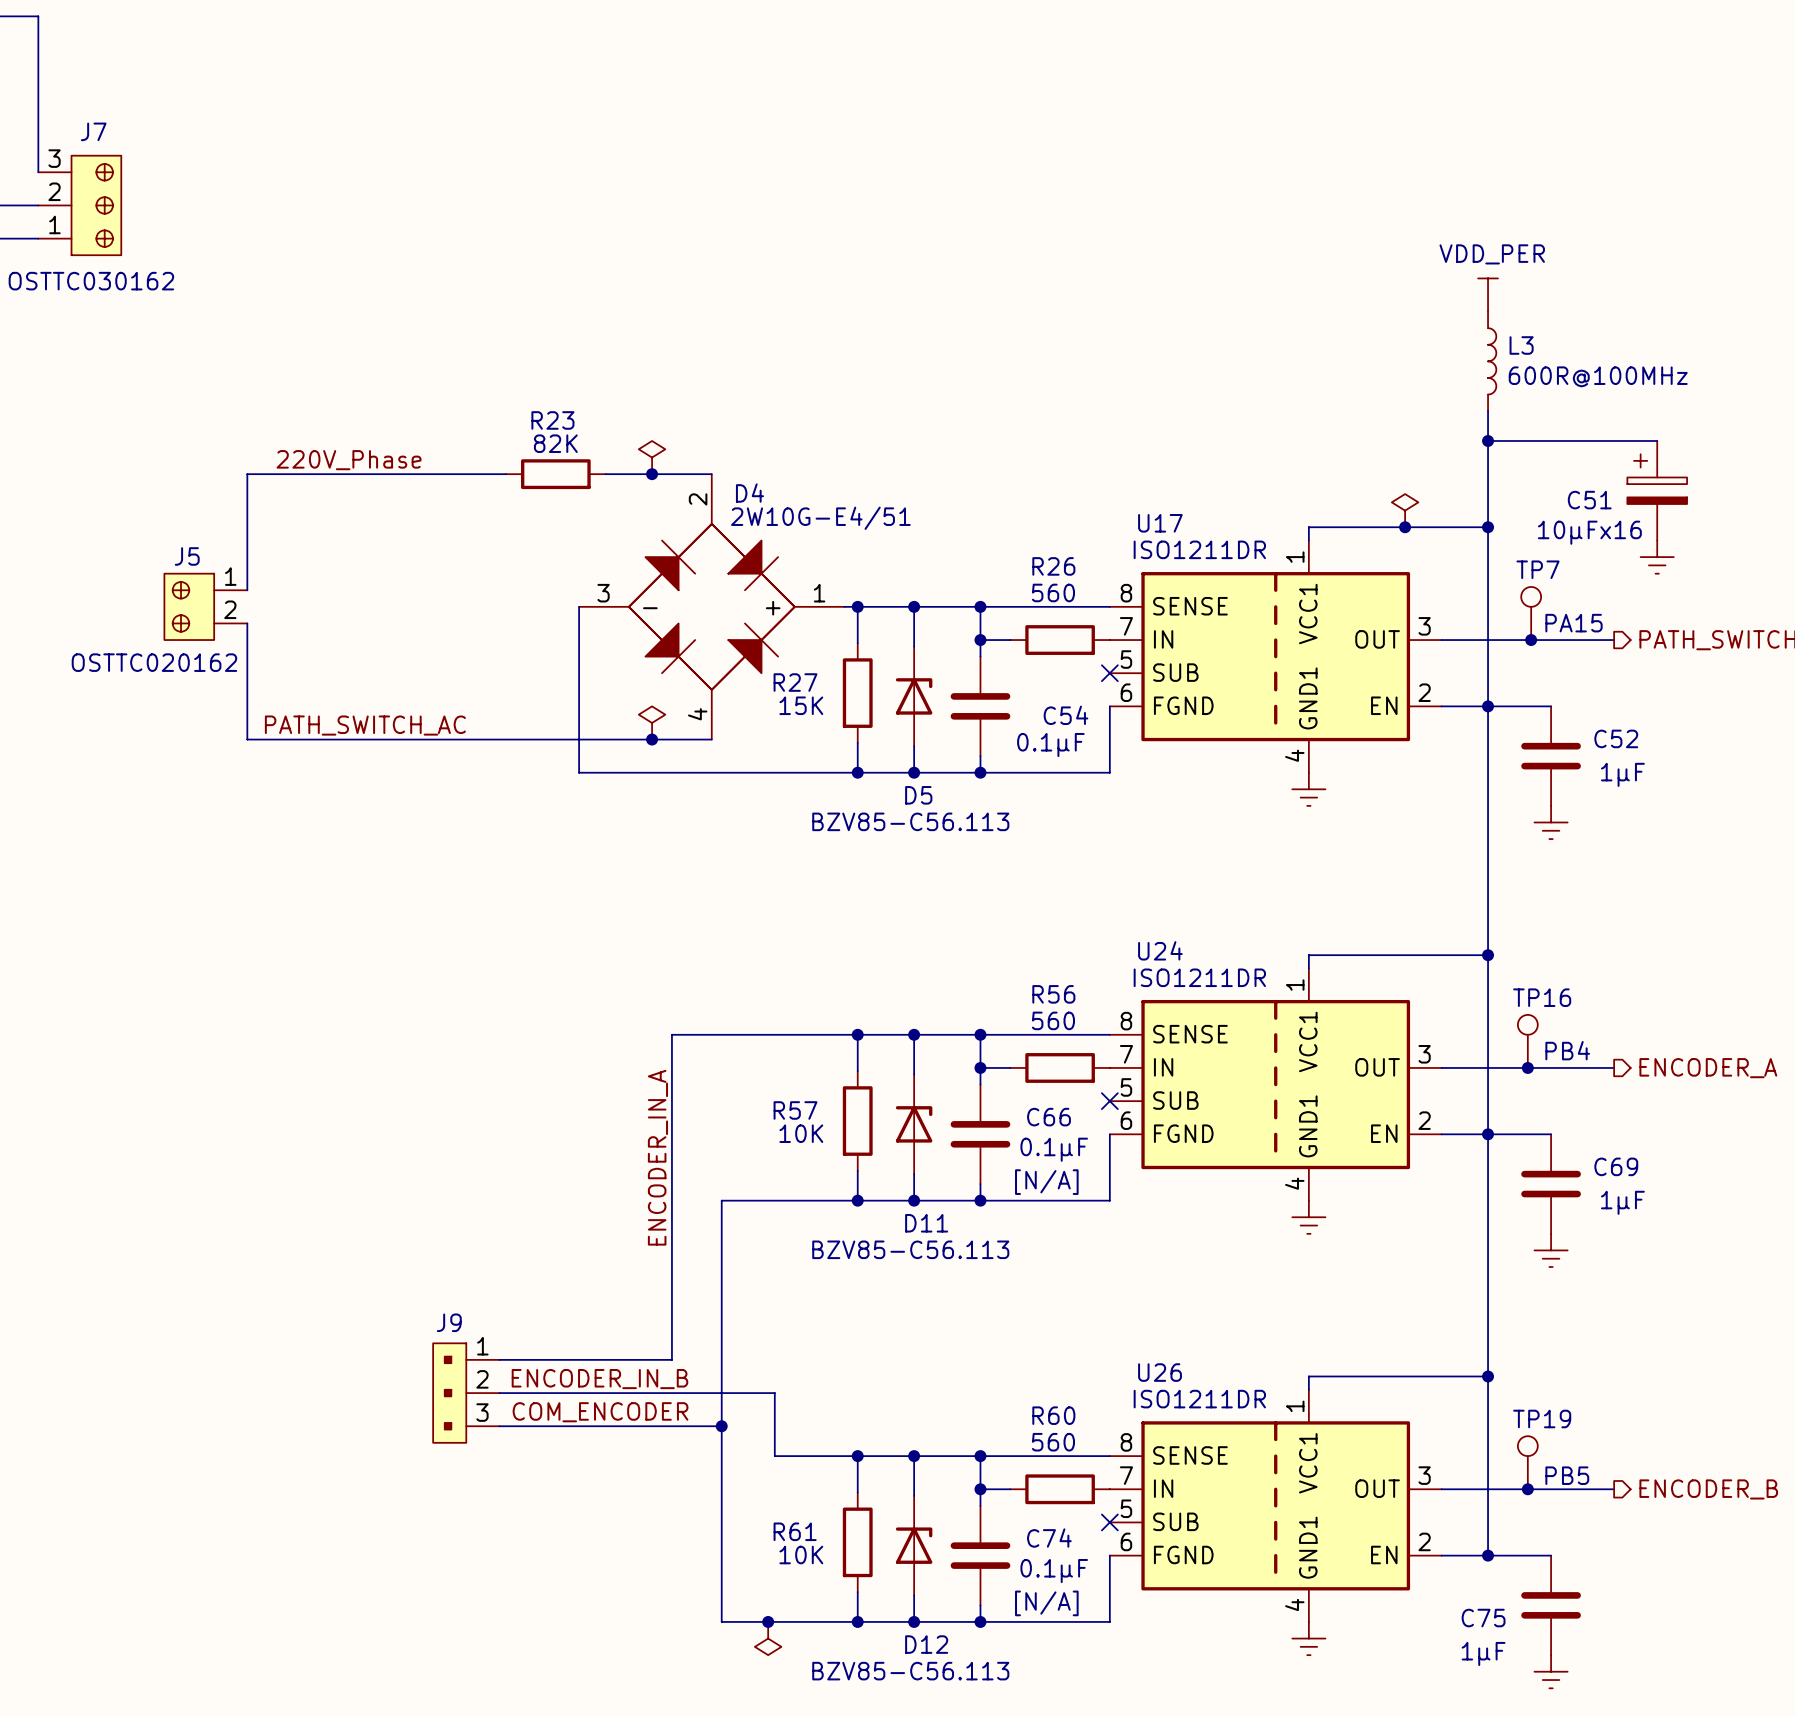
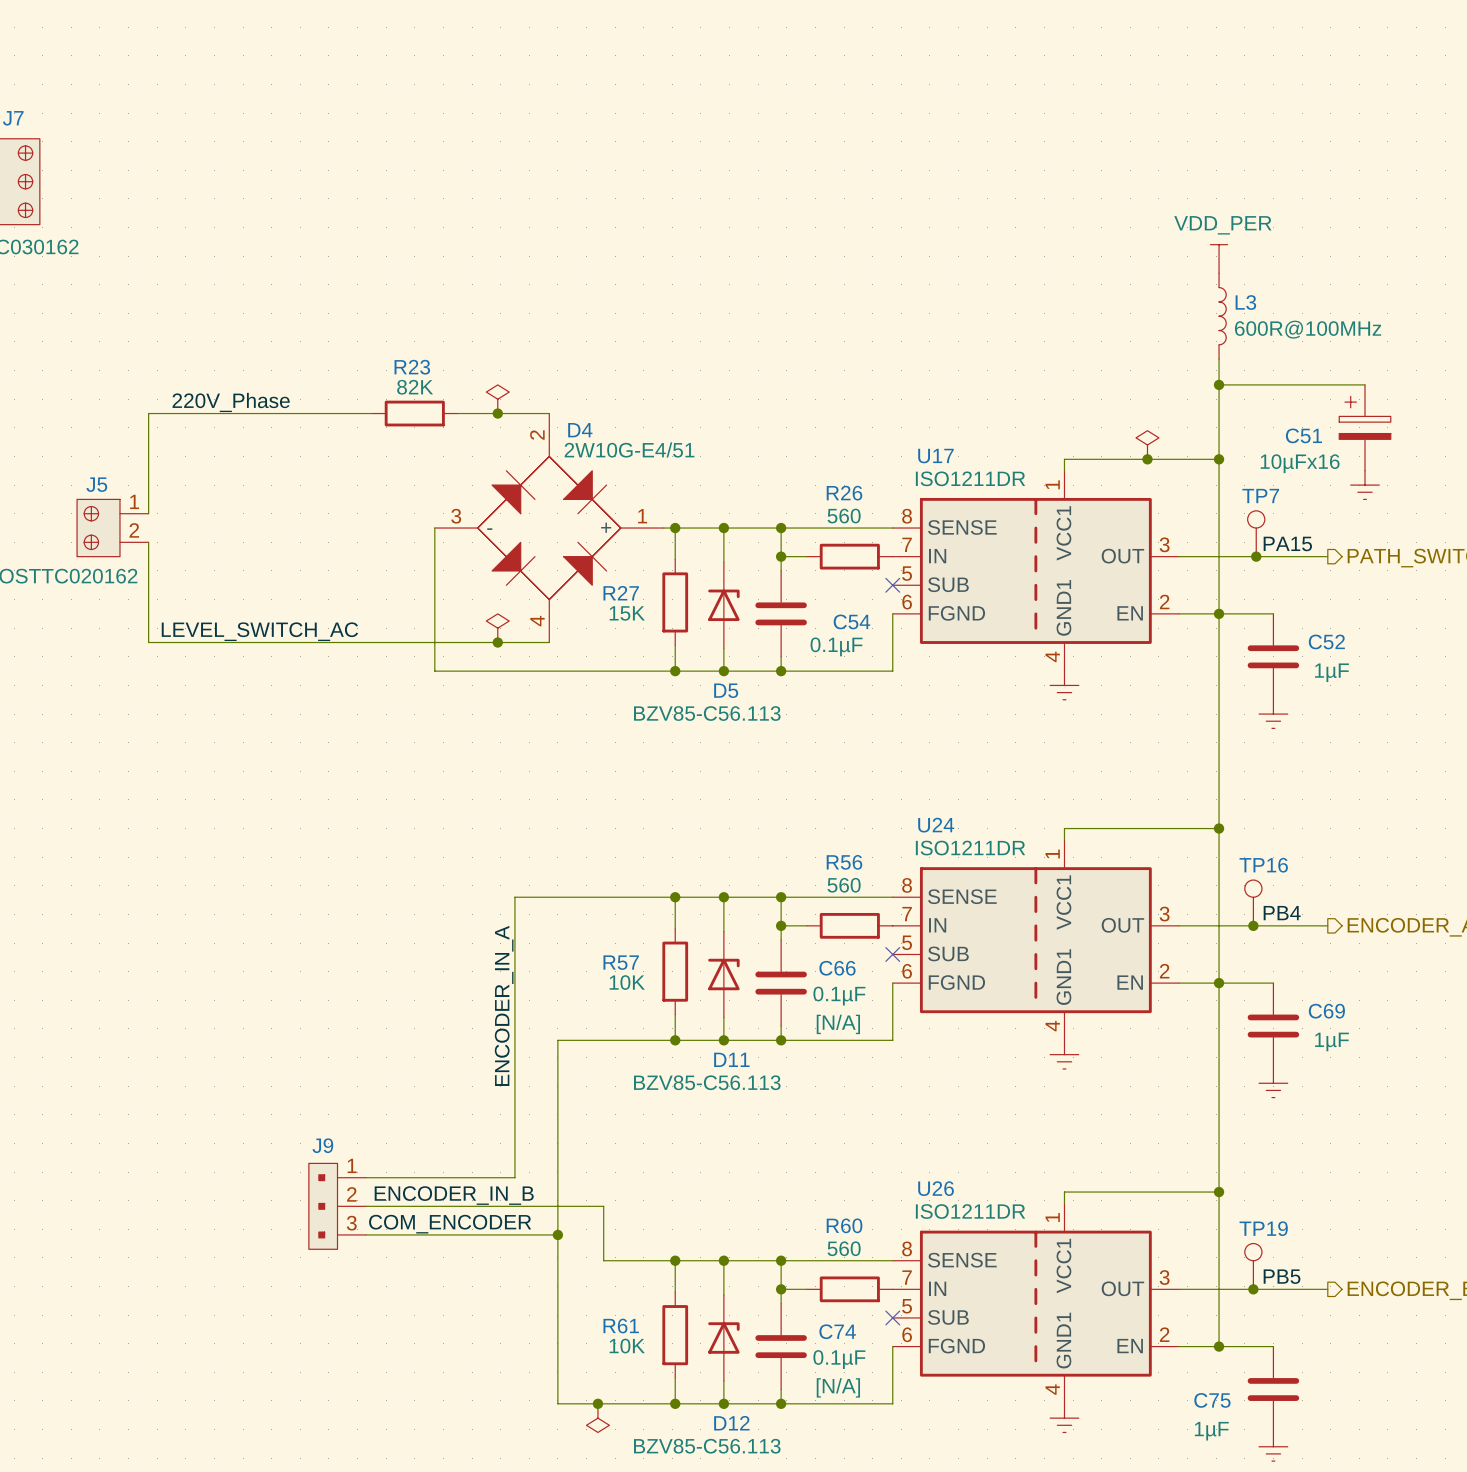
text: PA15 (1574, 623) -> none
label: none -> PA15 (1287, 543)
label: PATH_SWITCH_AC (365, 725) -> LEVEL_SWITCH_AC (259, 631)
text: PB4 (1567, 1050) -> none
label: none -> PB4 (1282, 913)
label: none -> PB5 (1282, 1276)
text: PB5 (1567, 1475) -> none

